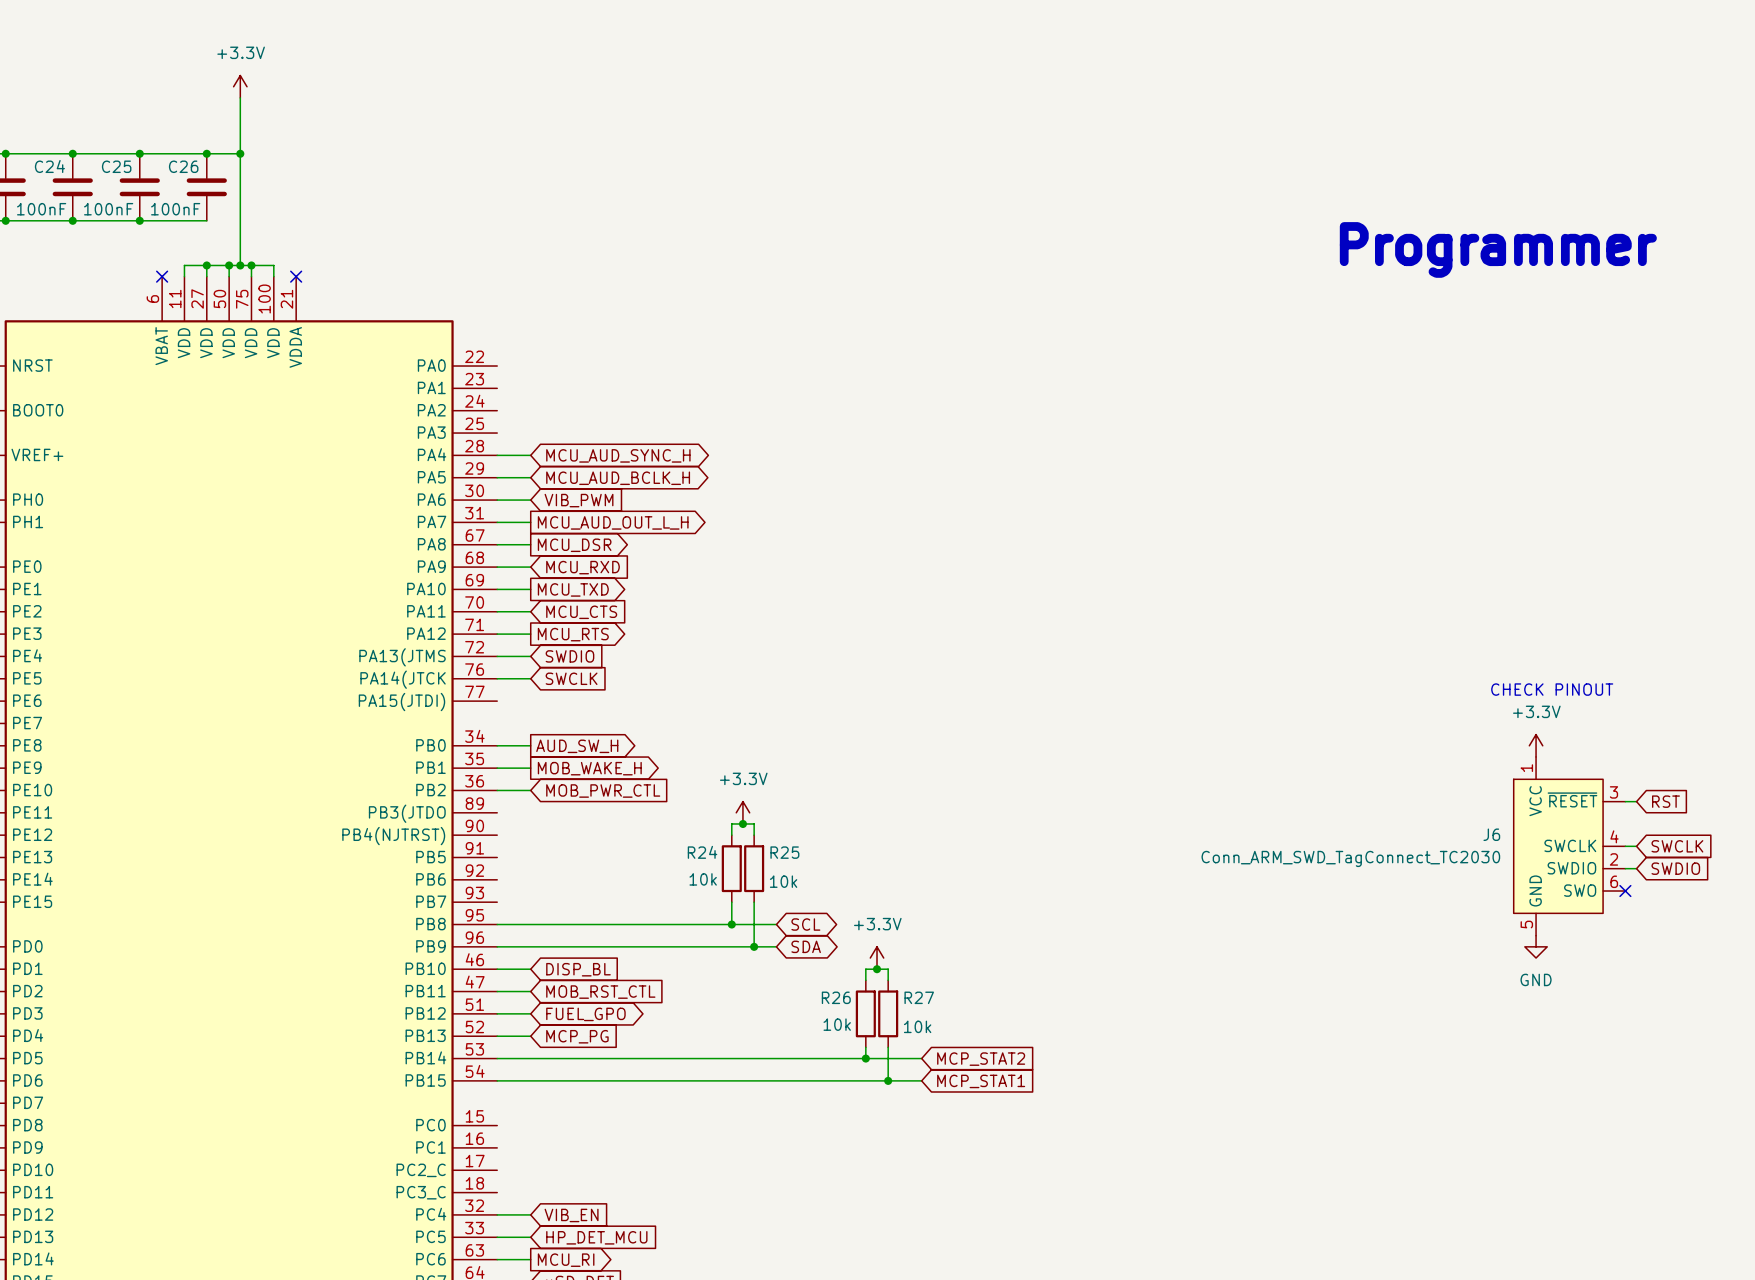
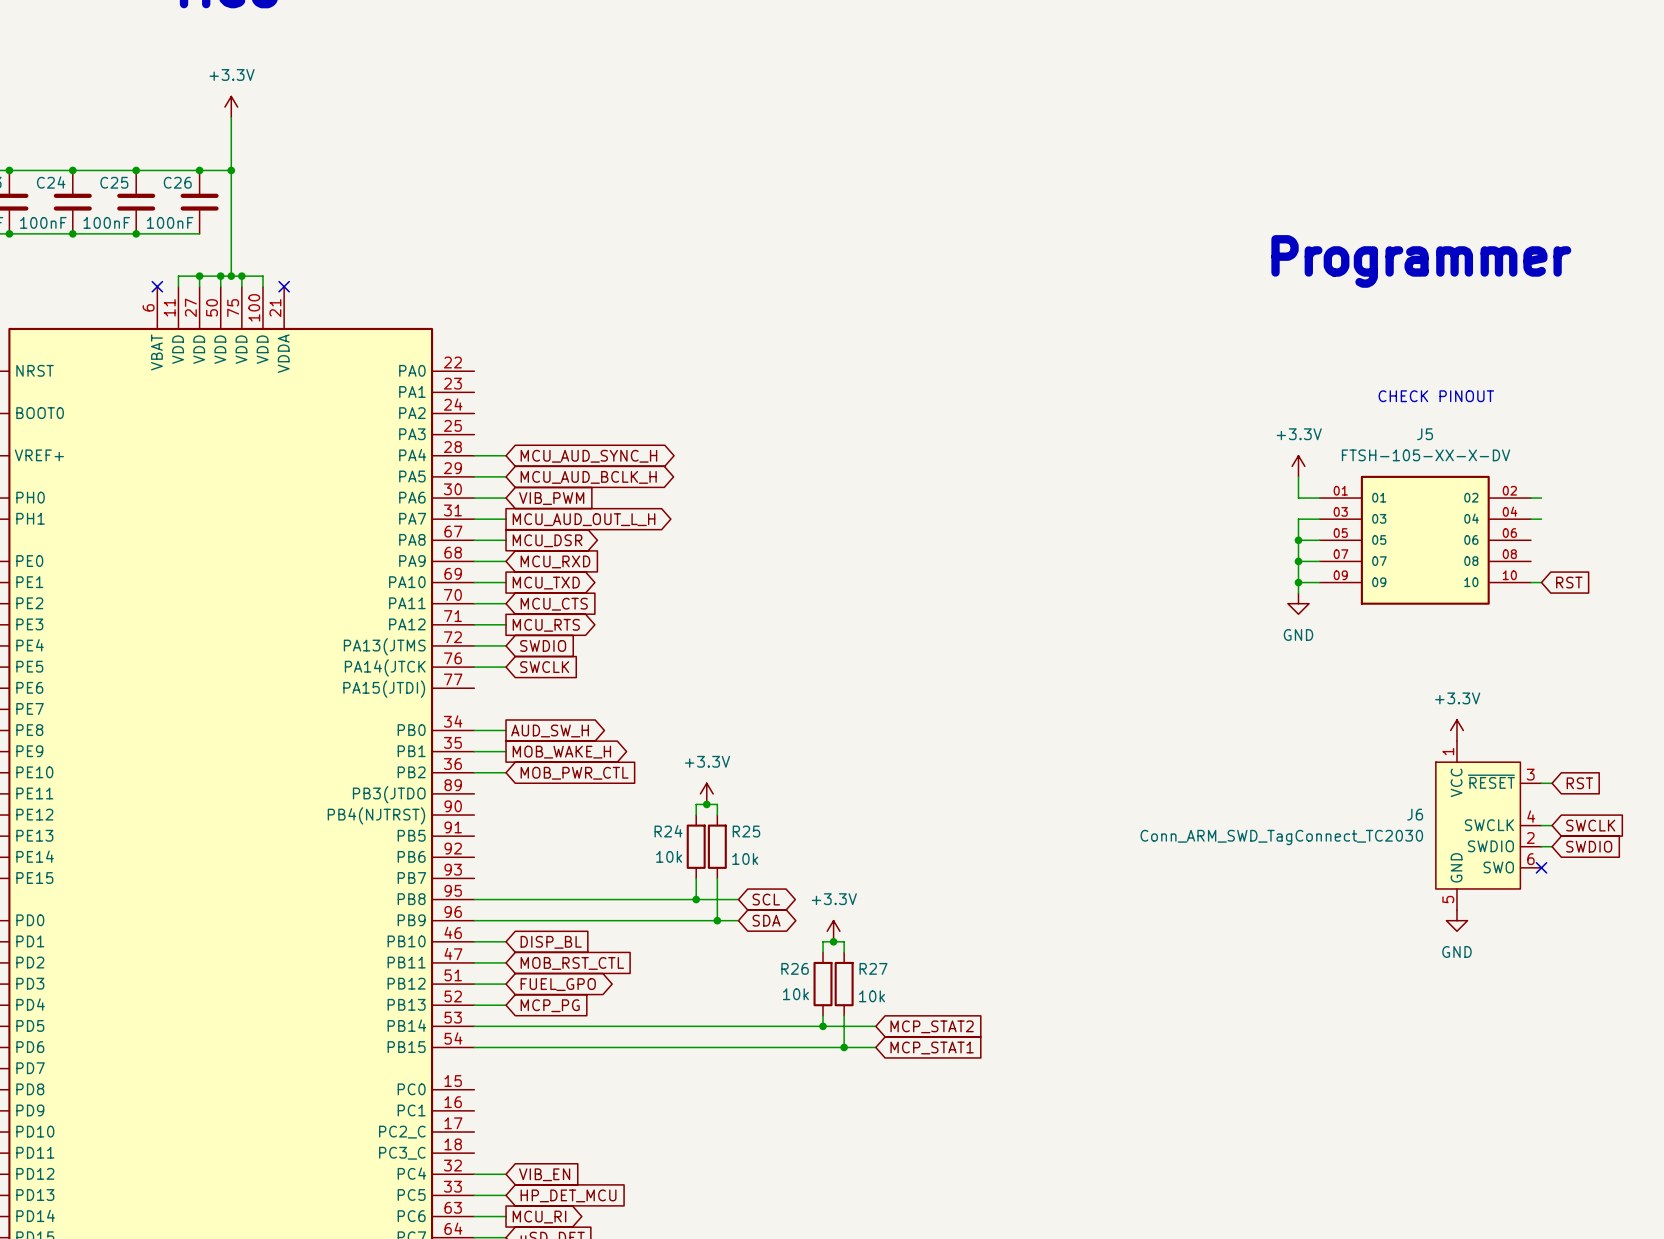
text: none -> CHECK PINOUT (1436, 396)
power symbol: none -> +3.3V (1298, 466)
wire: none -> (1298, 476) (1298, 498) (1319, 498)
wire: none -> (1530, 498) (1541, 498)
wire: none -> (1319, 519) (1298, 519) (1298, 593)
wire: none -> (1530, 519) (1541, 519)
wire: none -> (1298, 540) (1319, 540)
junction: none -> (1298, 540)
J5: none -> FTSH-105-XX-X-DV (1425, 540)
wire: none -> (1298, 561) (1319, 561)
junction: none -> (1298, 561)
wire: none -> (1298, 582) (1319, 582)
junction: none -> (1298, 582)
wire: none -> (1530, 582) (1541, 582)
global label: none -> RST (1569, 582)
power symbol: none -> GND (1298, 603)
text: CHECK PINOUT (1552, 689) -> none

